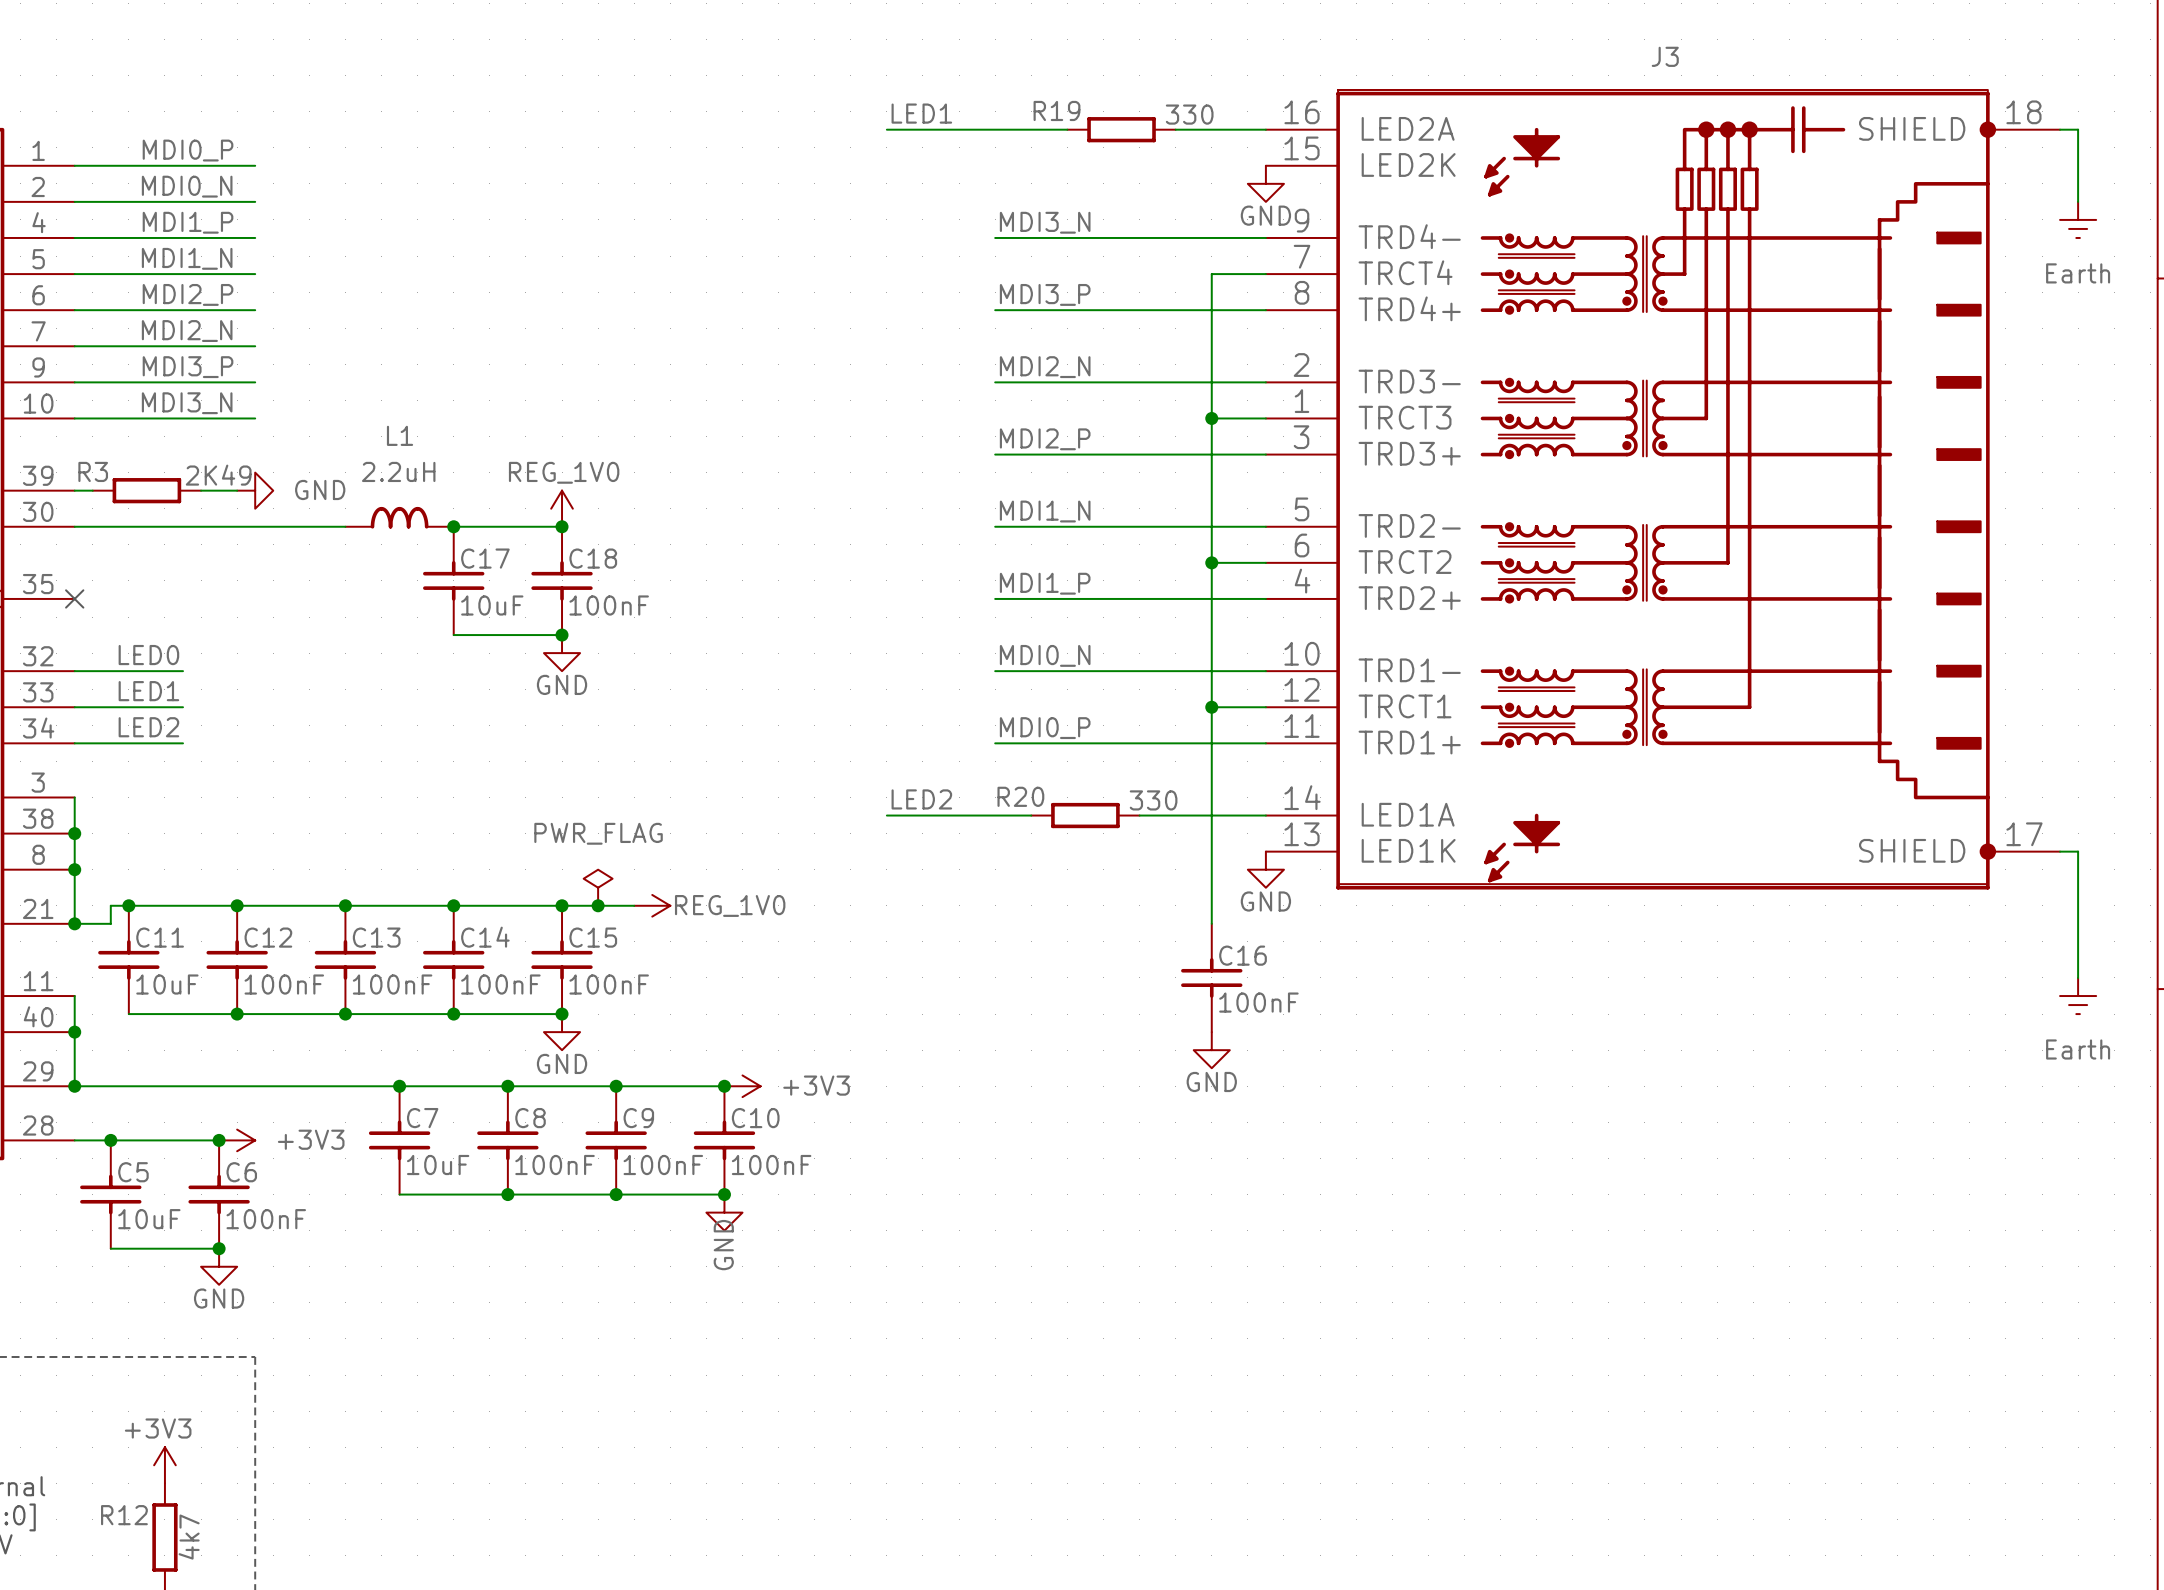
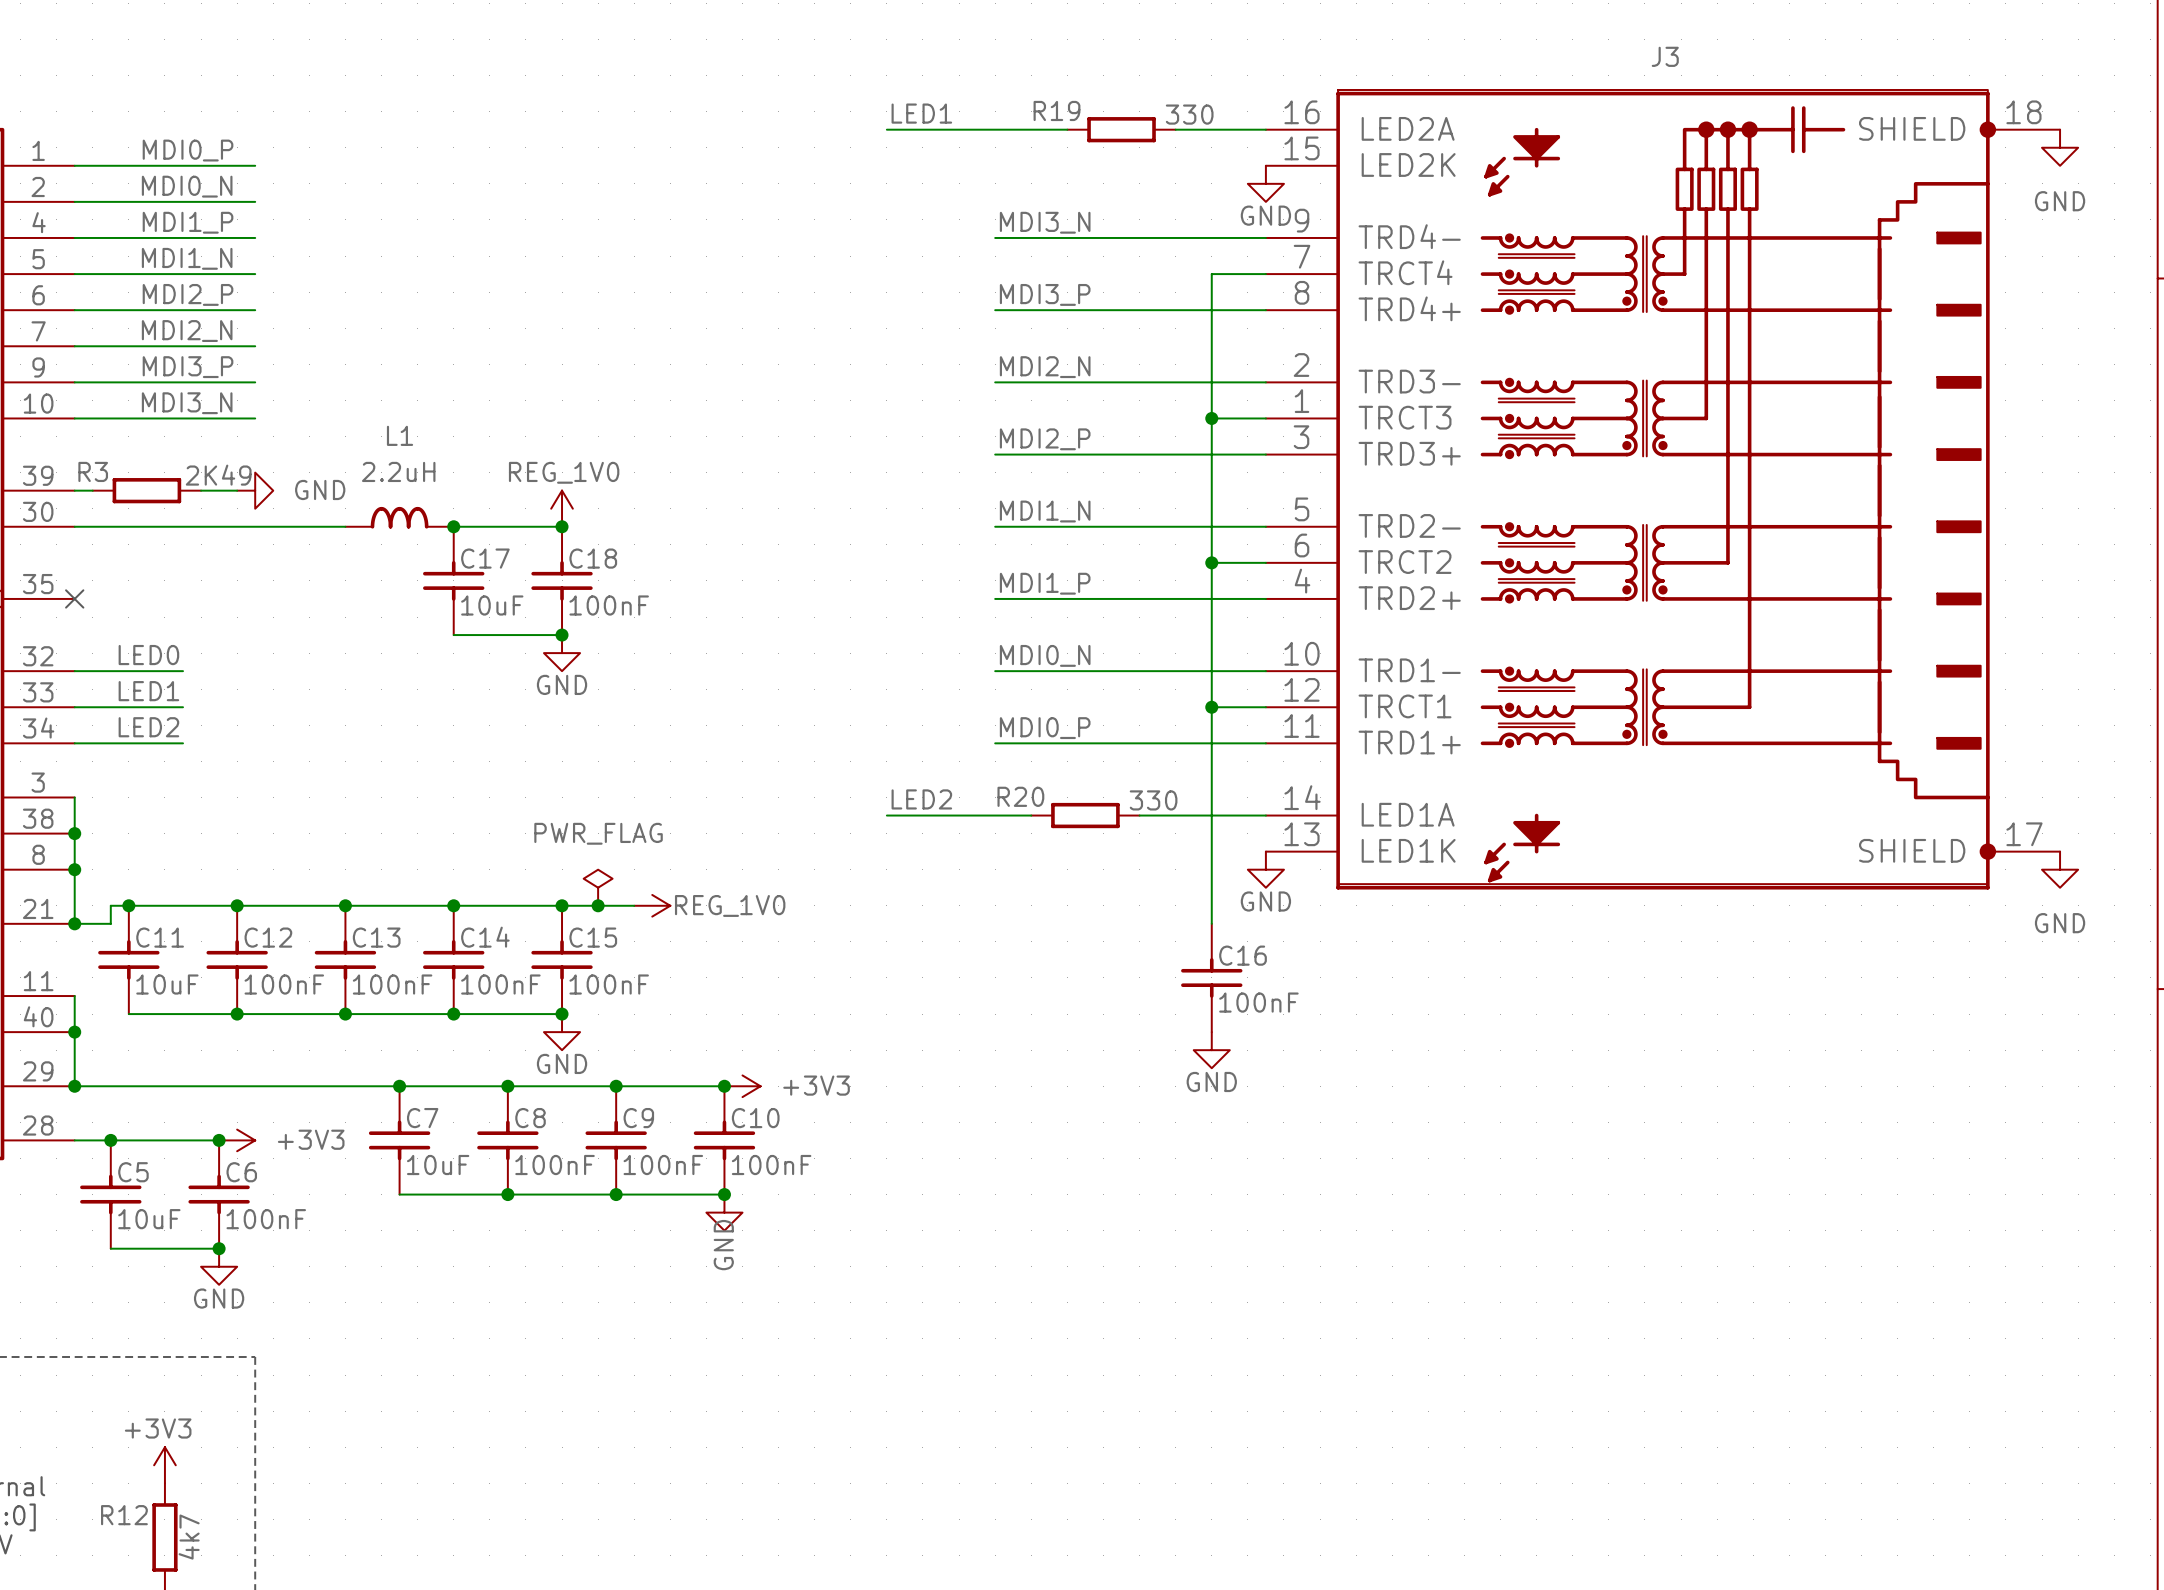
wire: (2060, 129) (2078, 129) (2078, 201) -> none
power symbol: none -> GND (2060, 147)
power symbol: Earth (2078, 219) -> none
wire: (2060, 851) (2078, 851) (2078, 977) -> none
power symbol: none -> GND (2060, 869)
power symbol: Earth (2078, 996) -> none

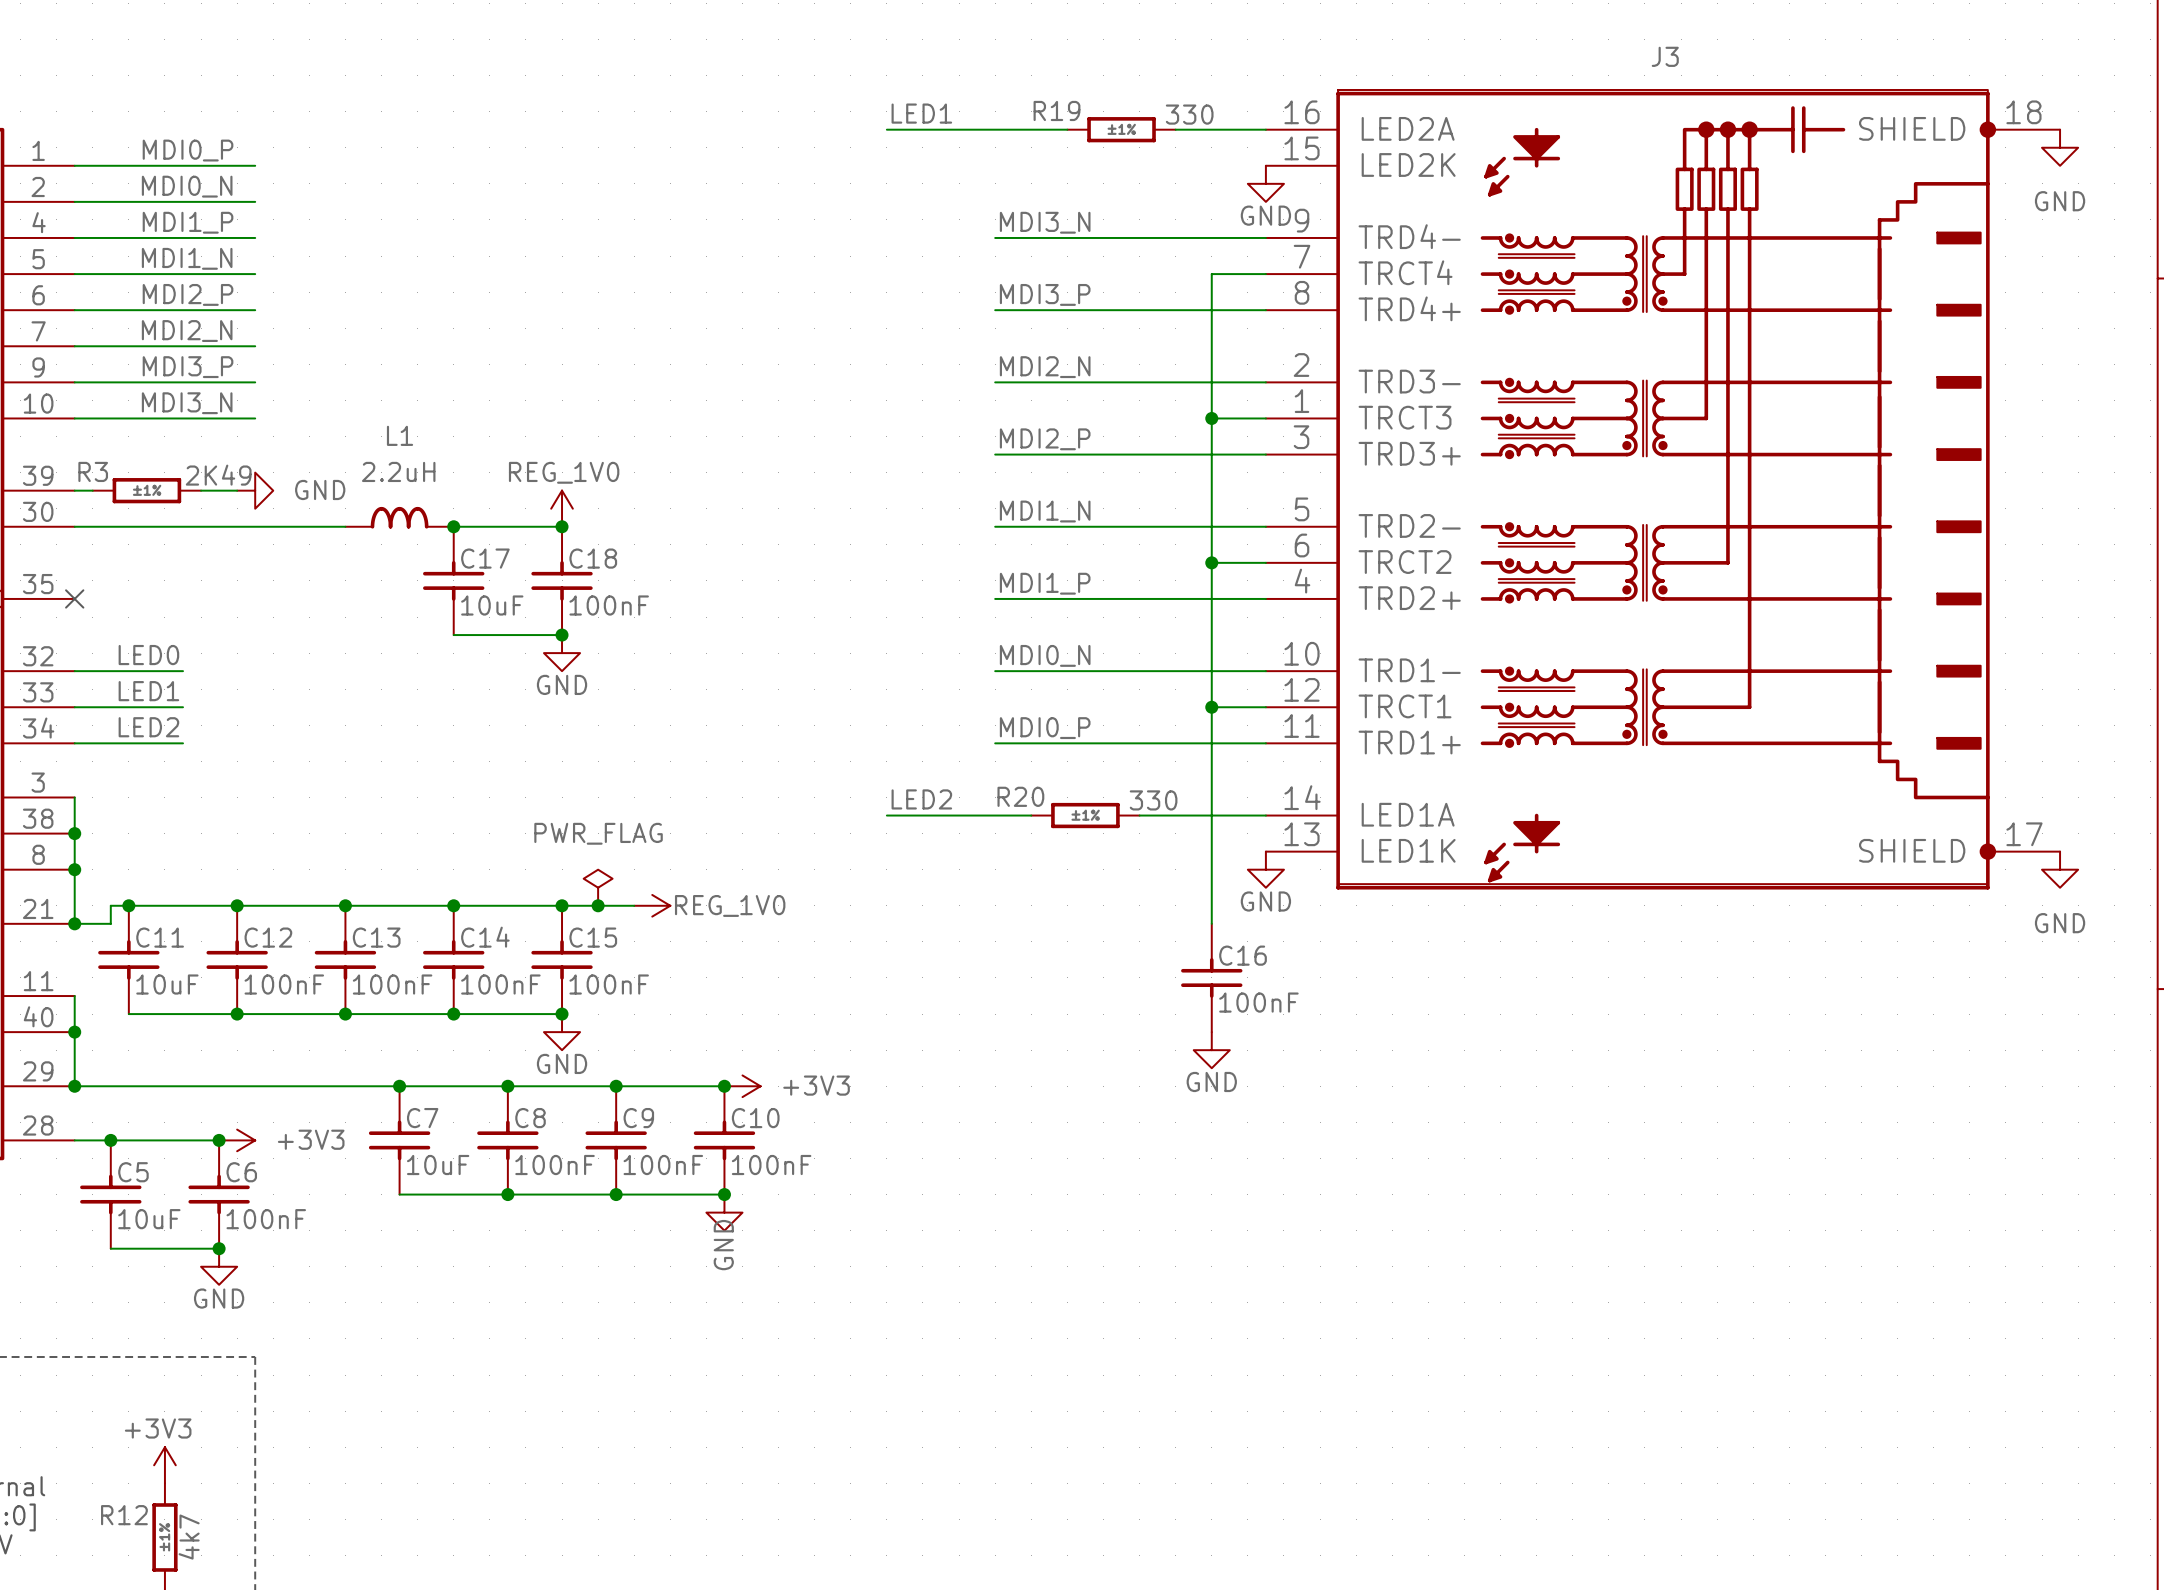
R19 text: none -> ±1% (1121, 129)
R3 text: none -> ±1% (147, 490)
R20 text: none -> ±1% (1085, 815)
R12 text: none -> ±1% (164, 1537)

